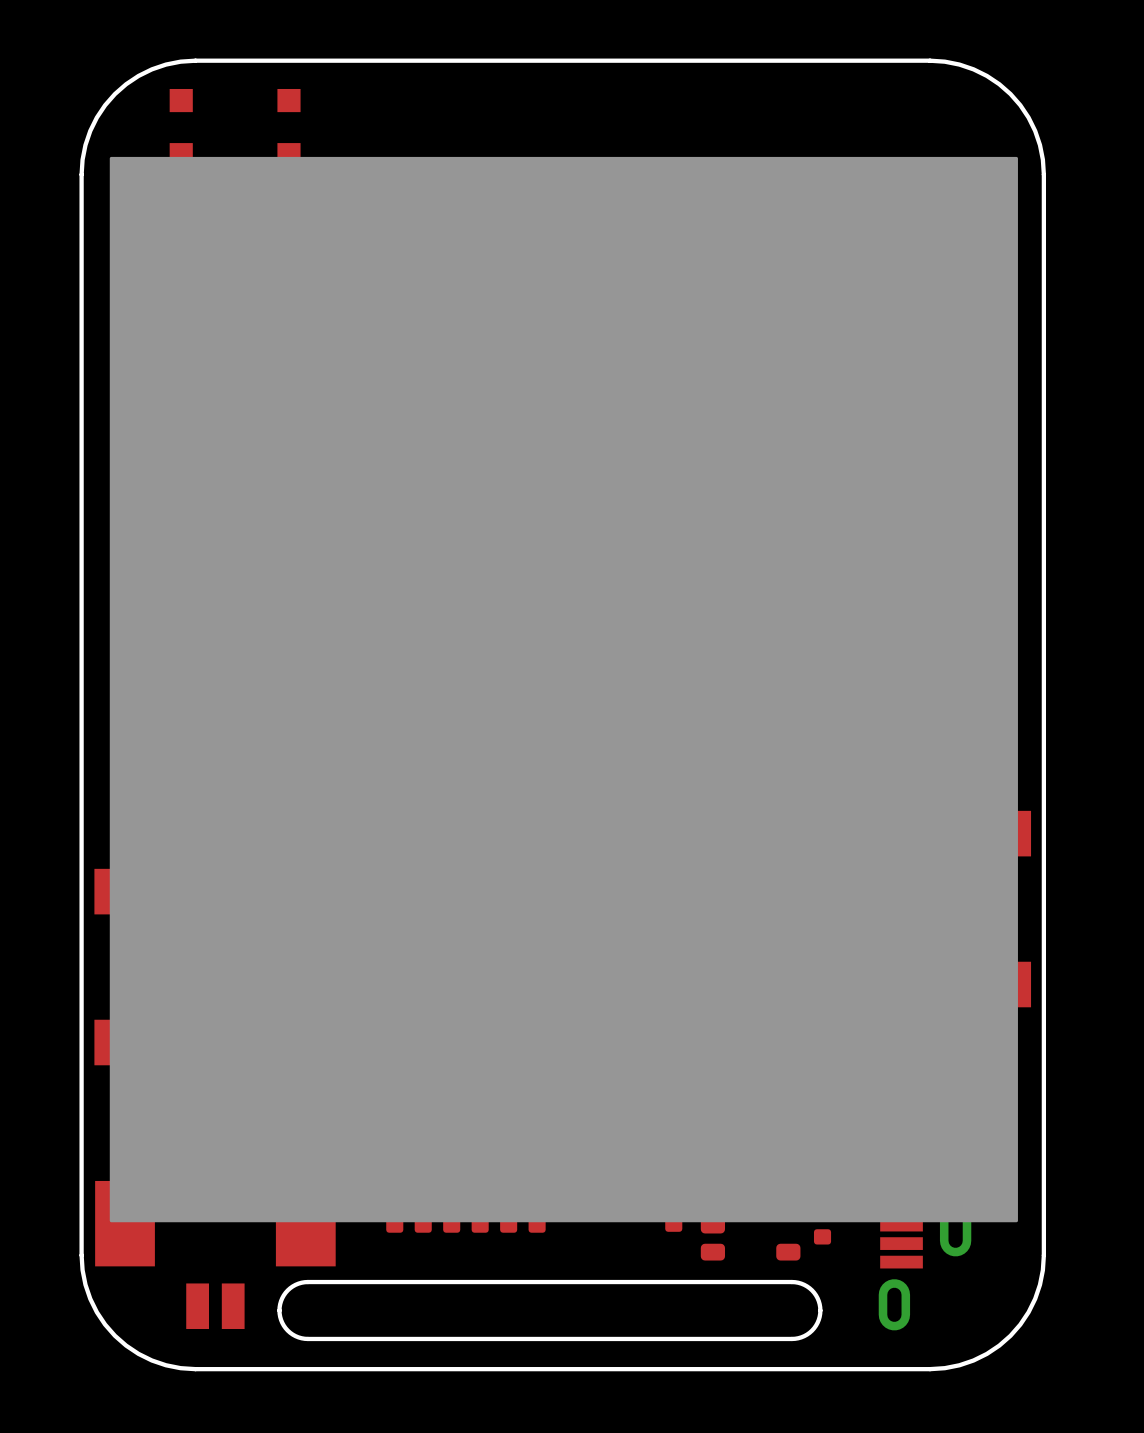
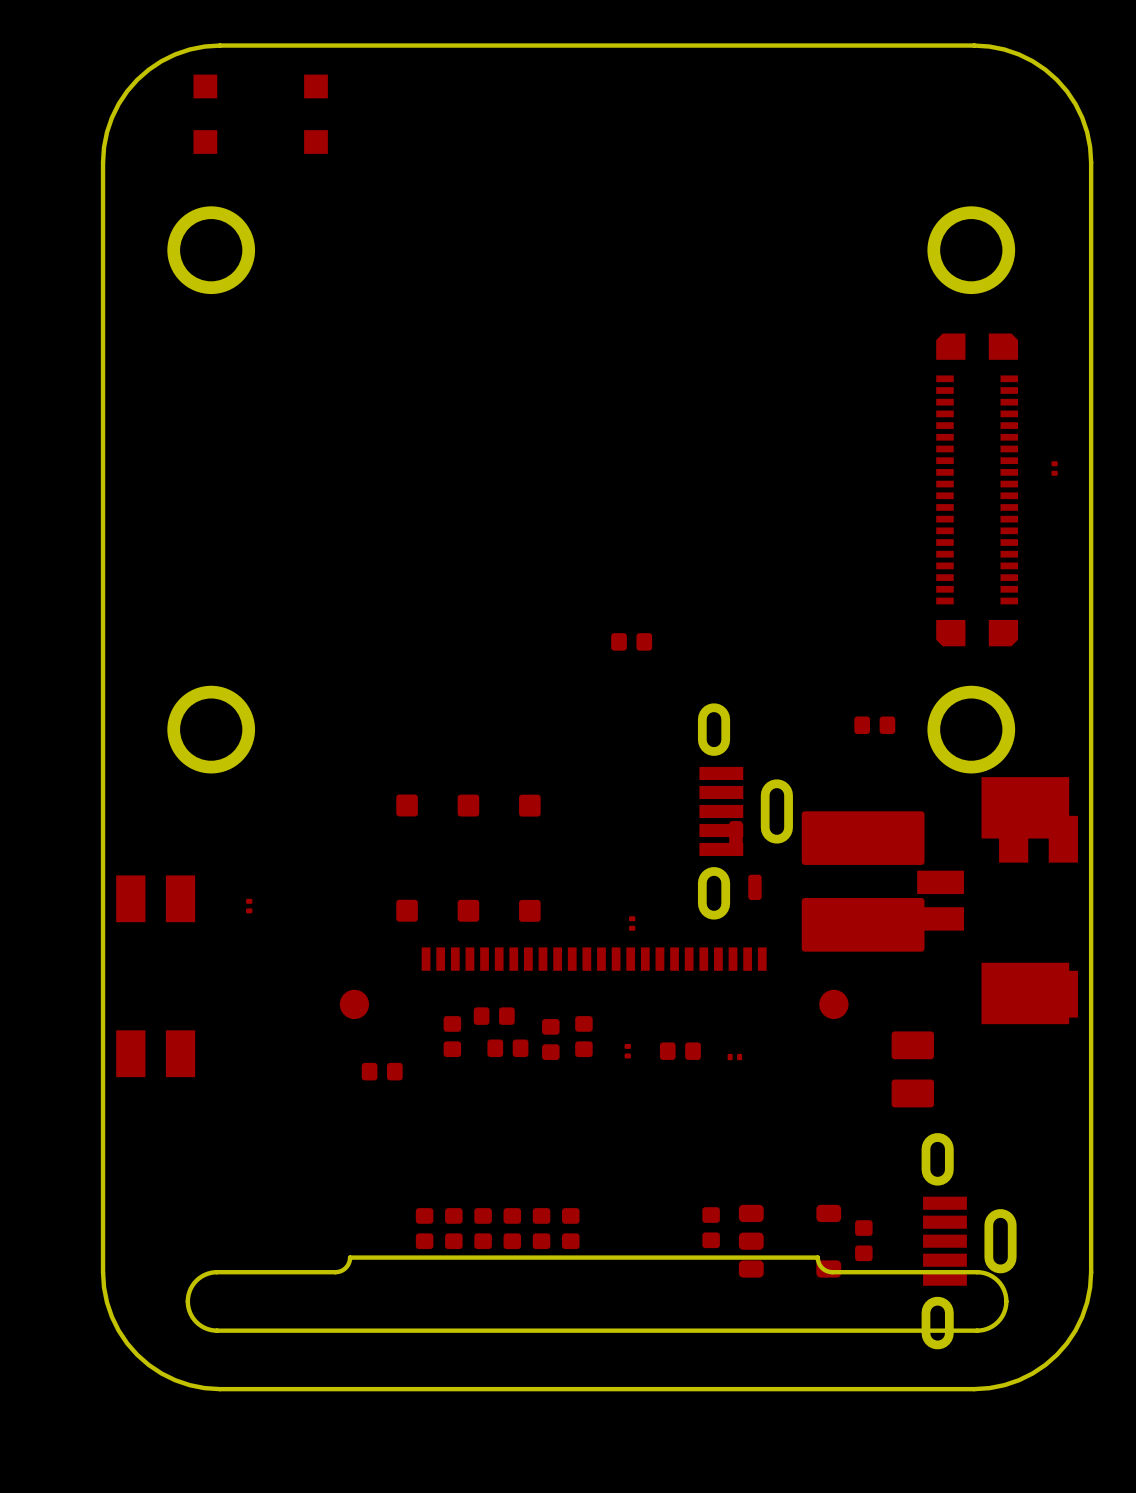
drawing: [109, 156, 1018, 1223] -> none
part: none -> (874, 725)
part: none -> (745, 811)
part: none -> (993, 900)
part: none -> (494, 1016)
part: none -> (452, 1036)
part: none -> (583, 1036)
part: none -> (550, 1039)
part: none -> (507, 1048)
part: none -> (627, 1051)
part: none -> (680, 1051)
part: none -> (734, 1057)
part: none -> (382, 1071)
board edge: none -> (817, 1257) (350, 1257) (347, 1266) (337, 1272) (217, 1272) (207, 1273) (198, 1278) (192, 1285) (188, 1294) (188, 1304) (190, 1314) (196, 1322) (204, 1327) (217, 1330) (977, 1330) (986, 1329) (995, 1324) (1001, 1316) (1005, 1307) (1005, 1294) (1001, 1285) (995, 1278) (983, 1272) (830, 1272) (822, 1267) (817, 1257)
part: (215, 1254) -> none
board edge: (791, 1282) (304, 1282) (295, 1284) (285, 1292) (281, 1301) (279, 1313) (282, 1322) (287, 1330) (295, 1336) (307, 1338) (795, 1338) (804, 1336) (814, 1328) (818, 1319) (820, 1307) (816, 1295) (809, 1288) (801, 1283) (791, 1282) -> none

